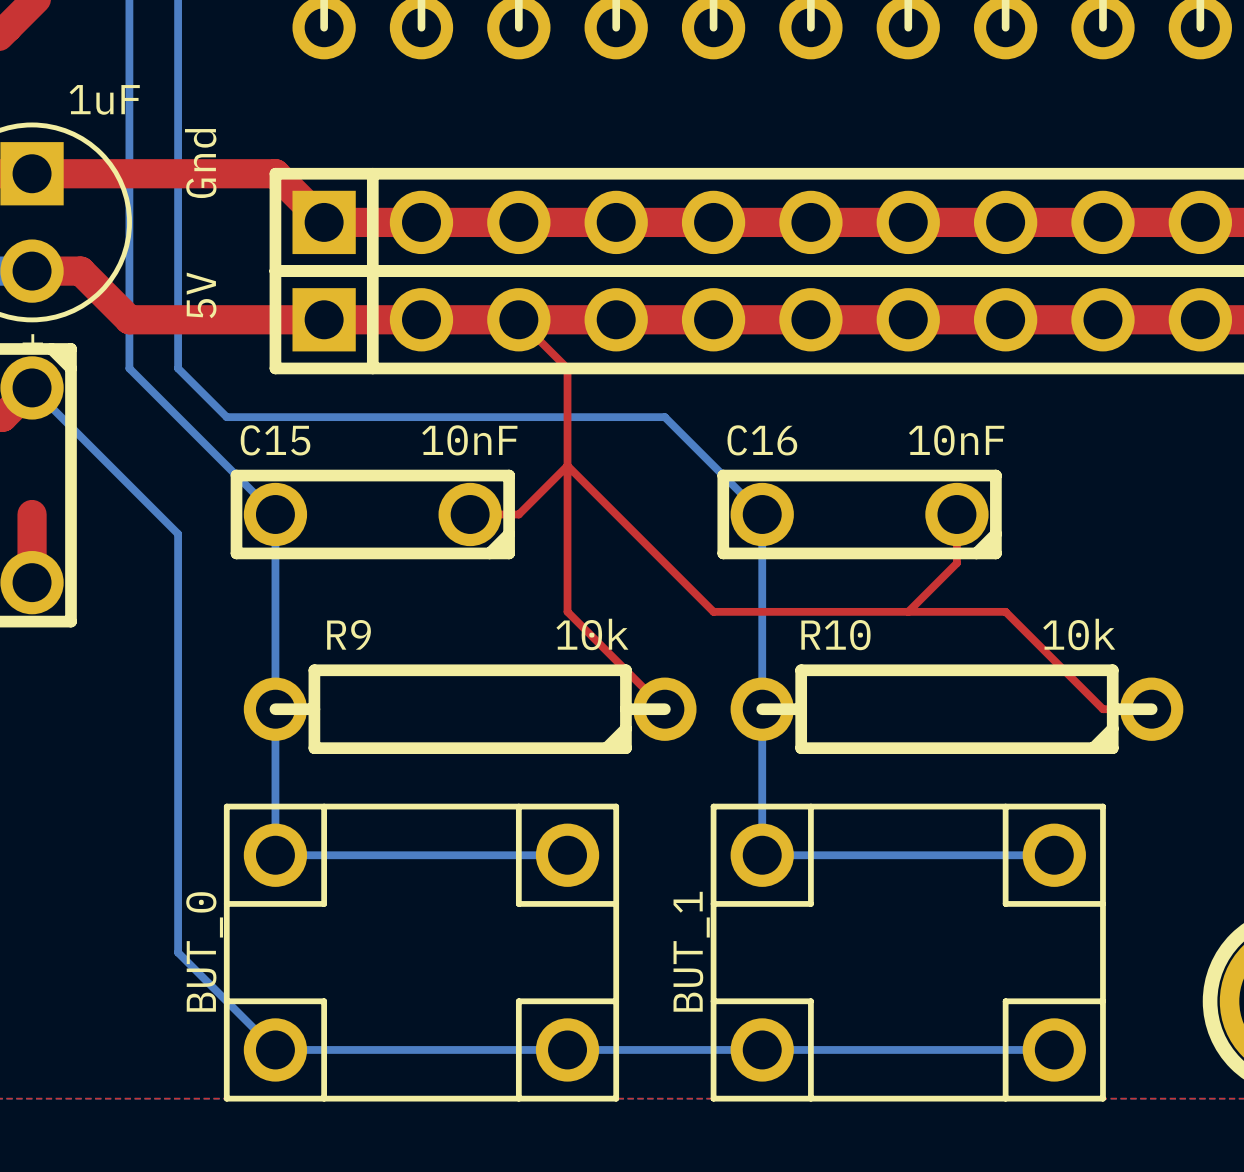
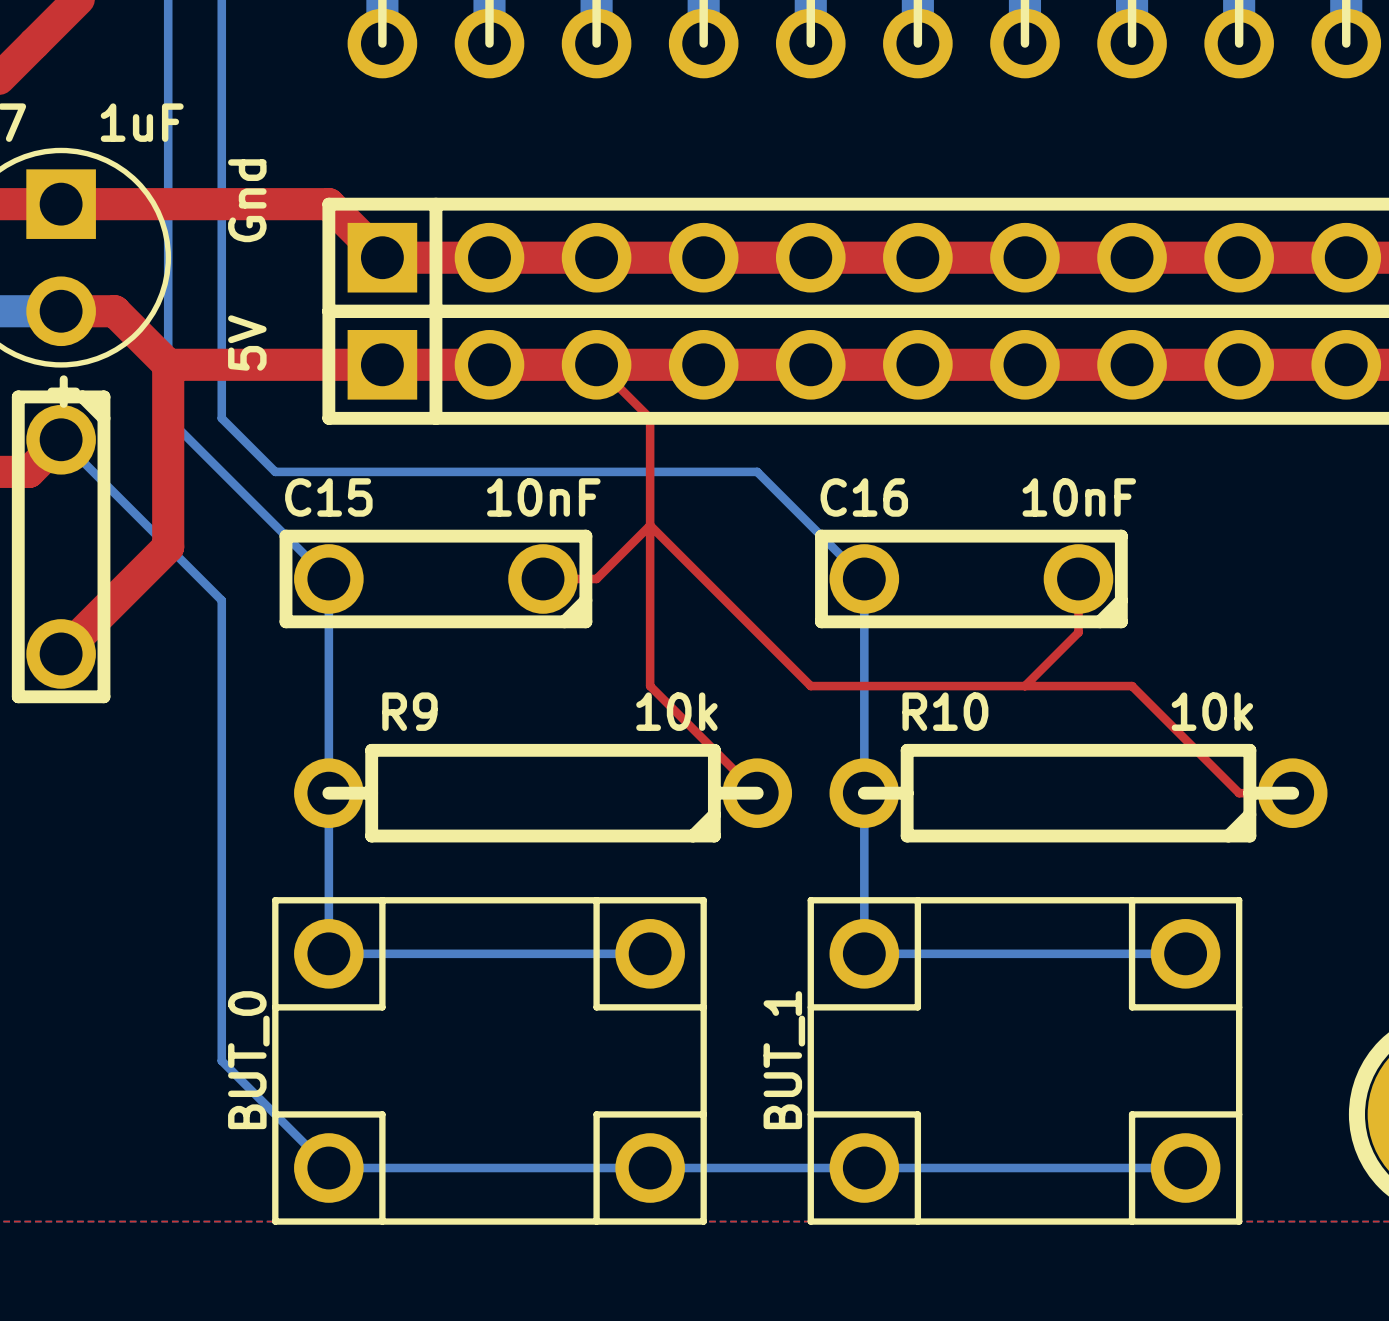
top track: (32, 514) (32, 582) -> (168, 364) (168, 546) (61, 653)

